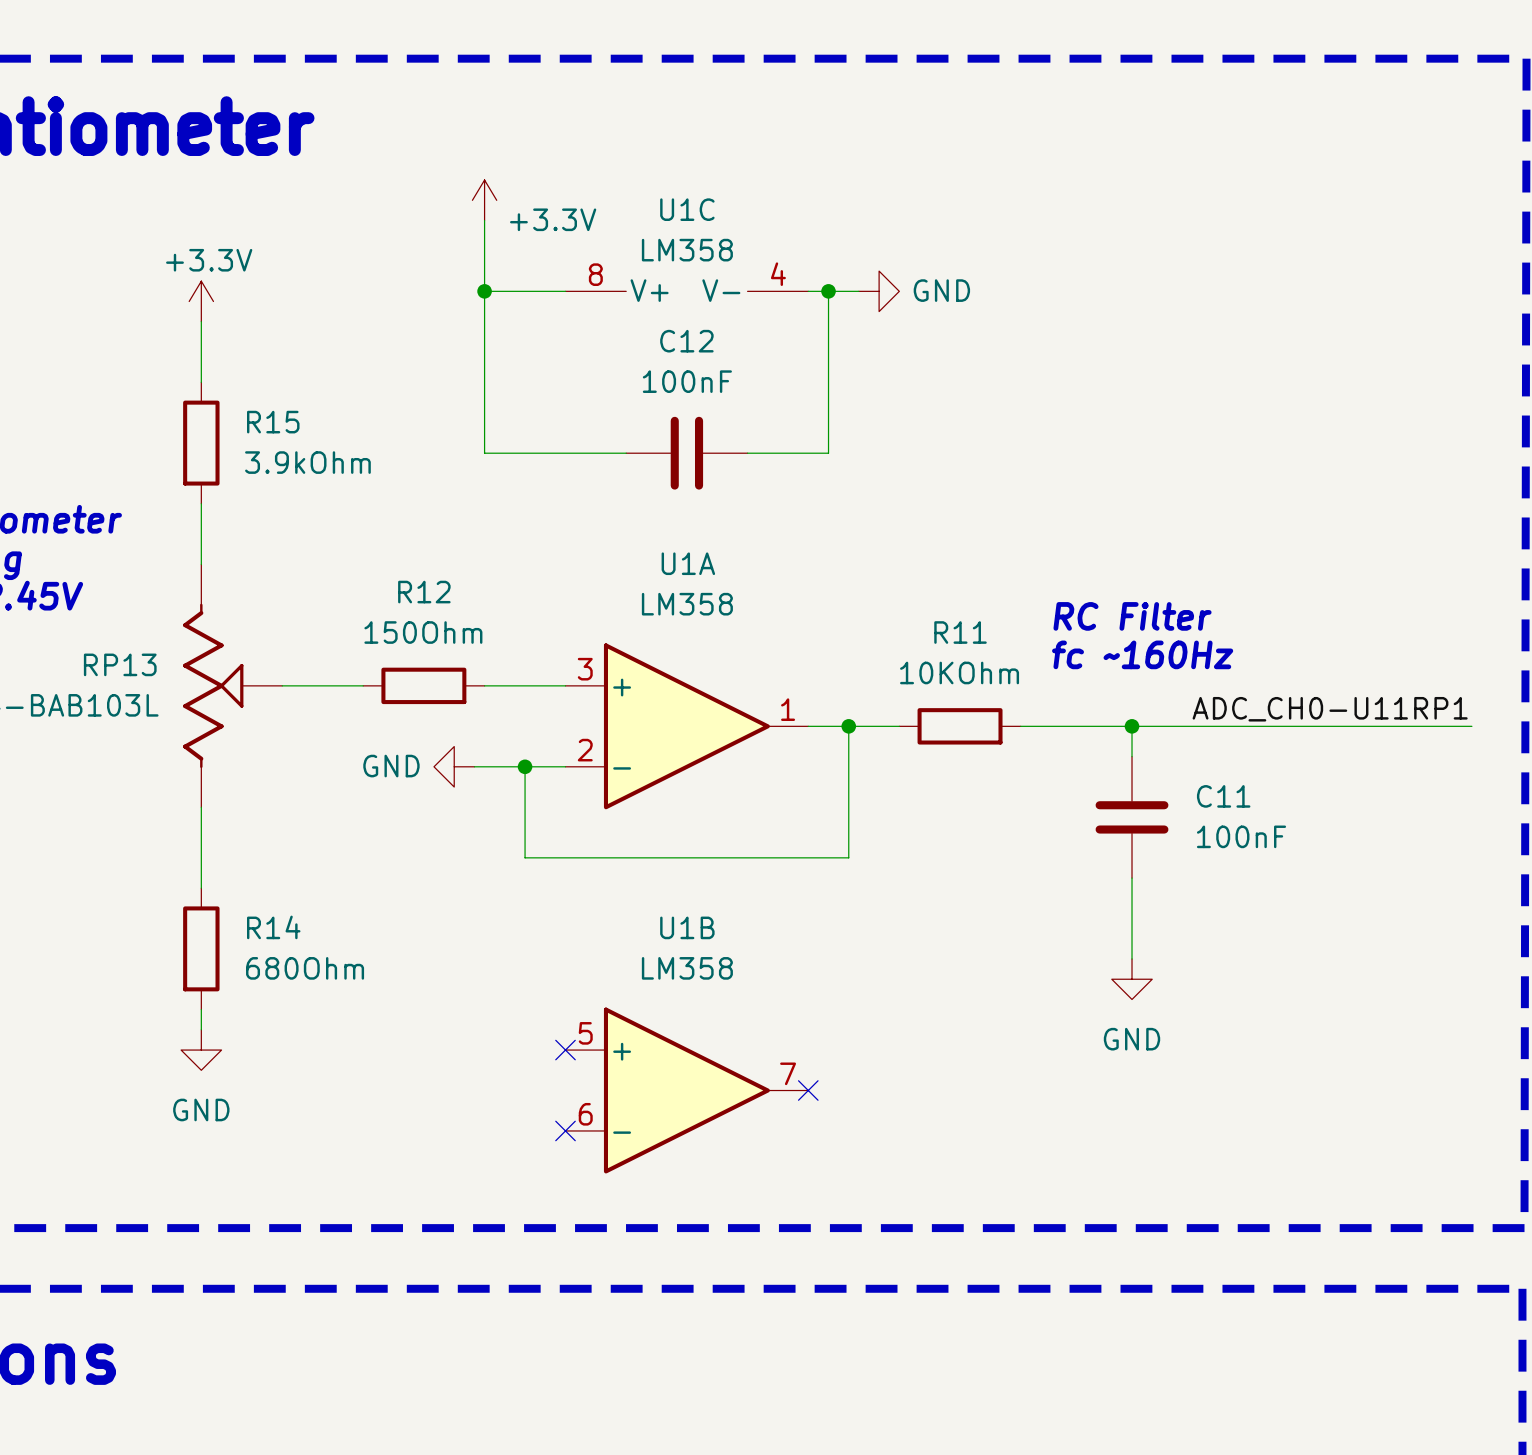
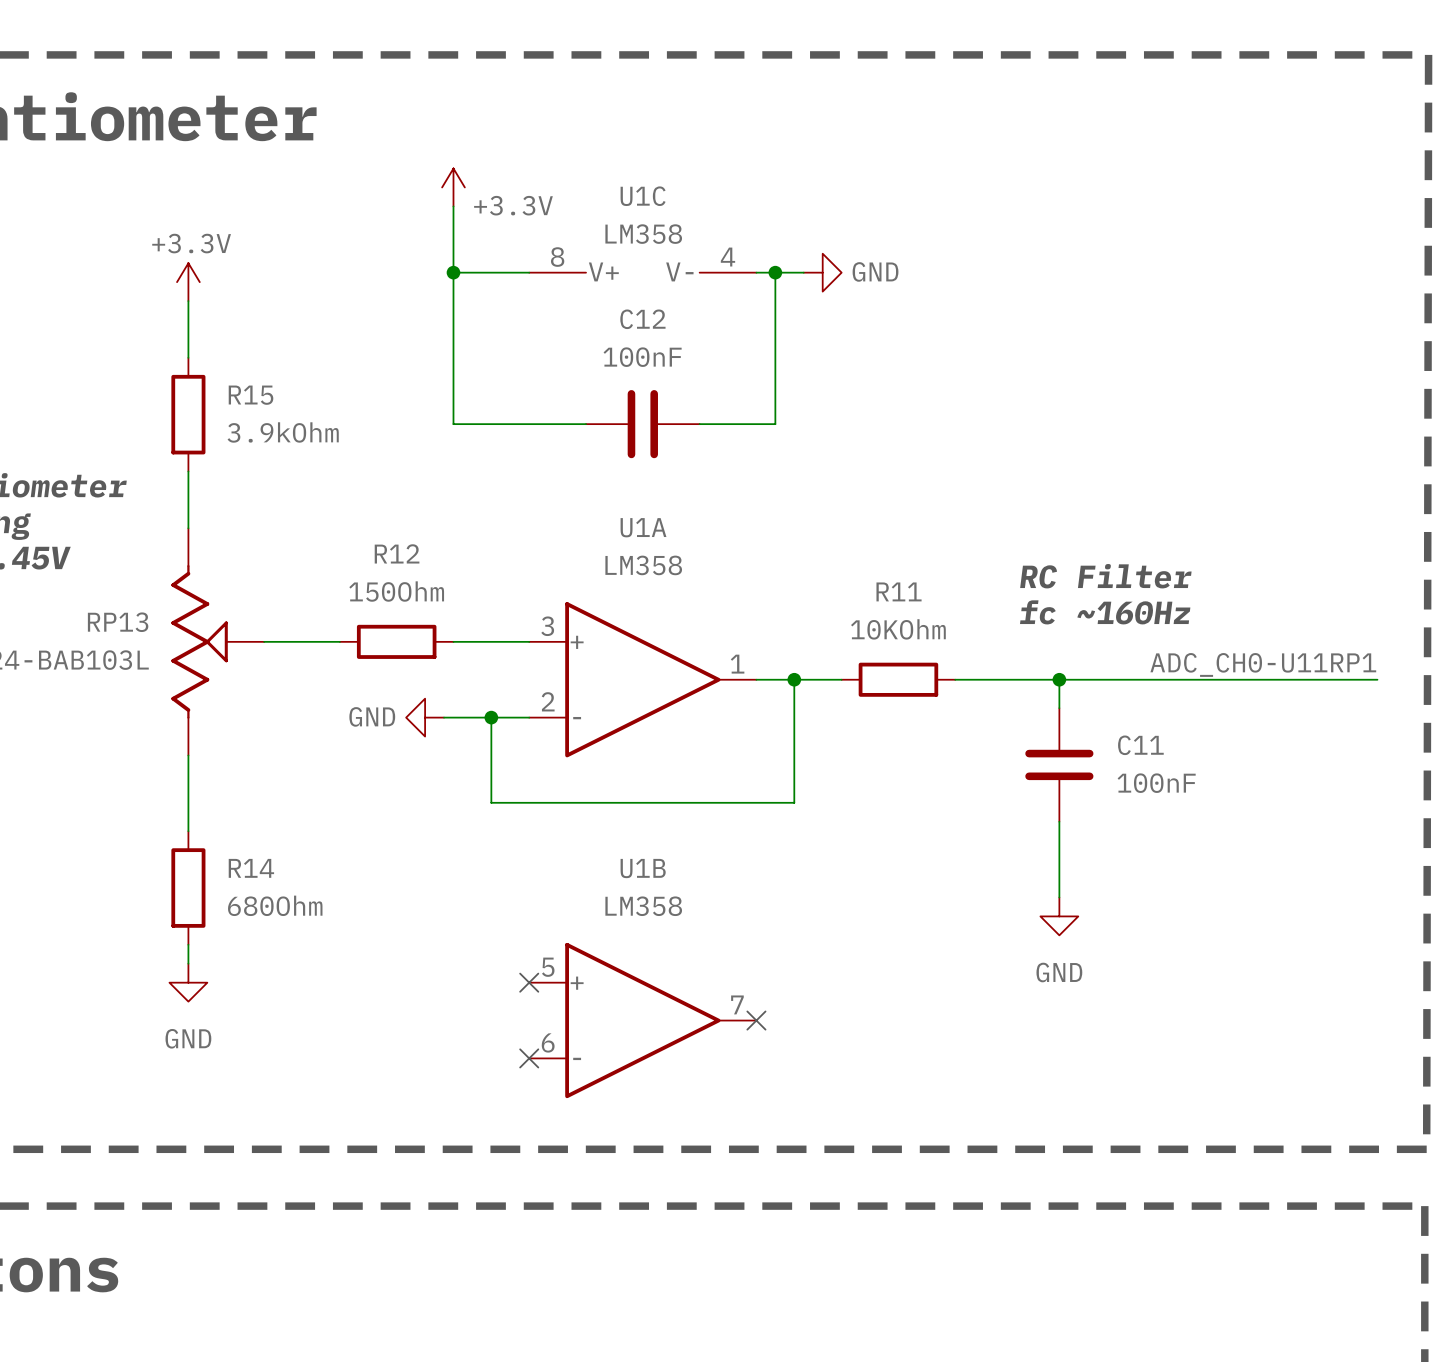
text position: RC Filter (1132, 616) -> RC Filter (1105, 576)
text position: fc ~160Hz (1142, 654) -> fc ~160Hz (1105, 612)

